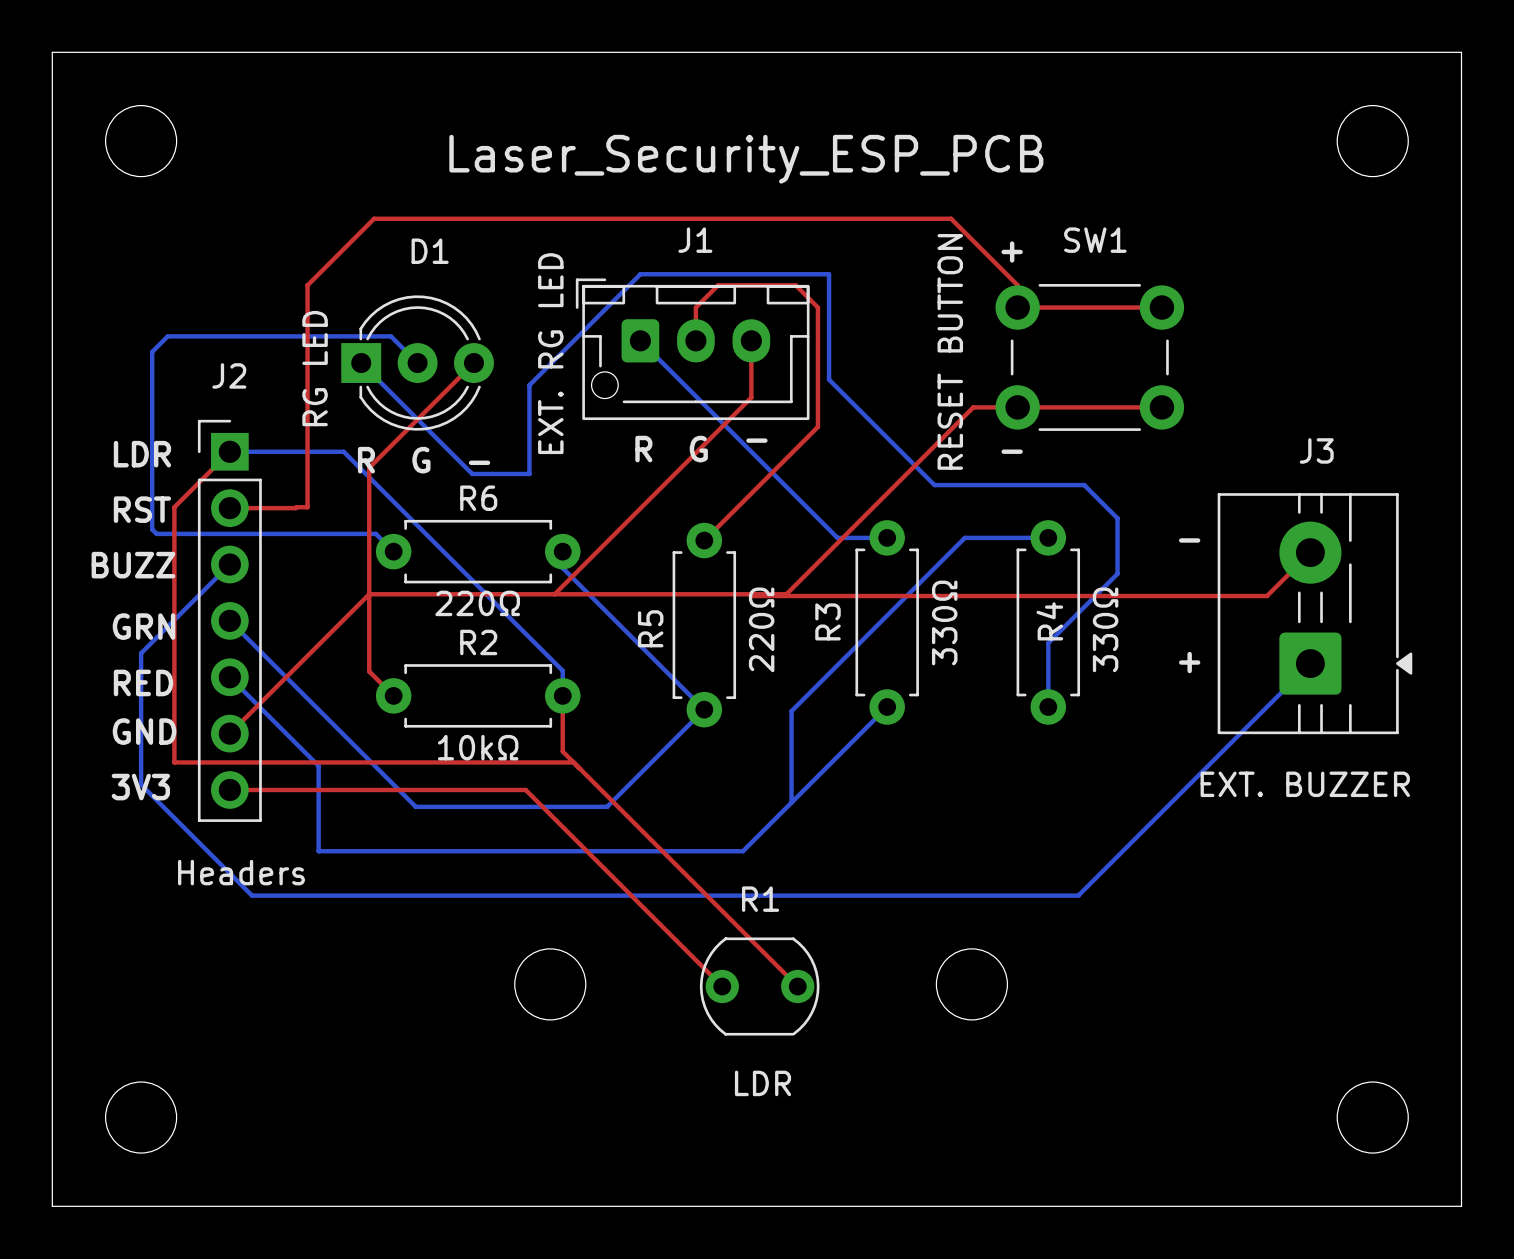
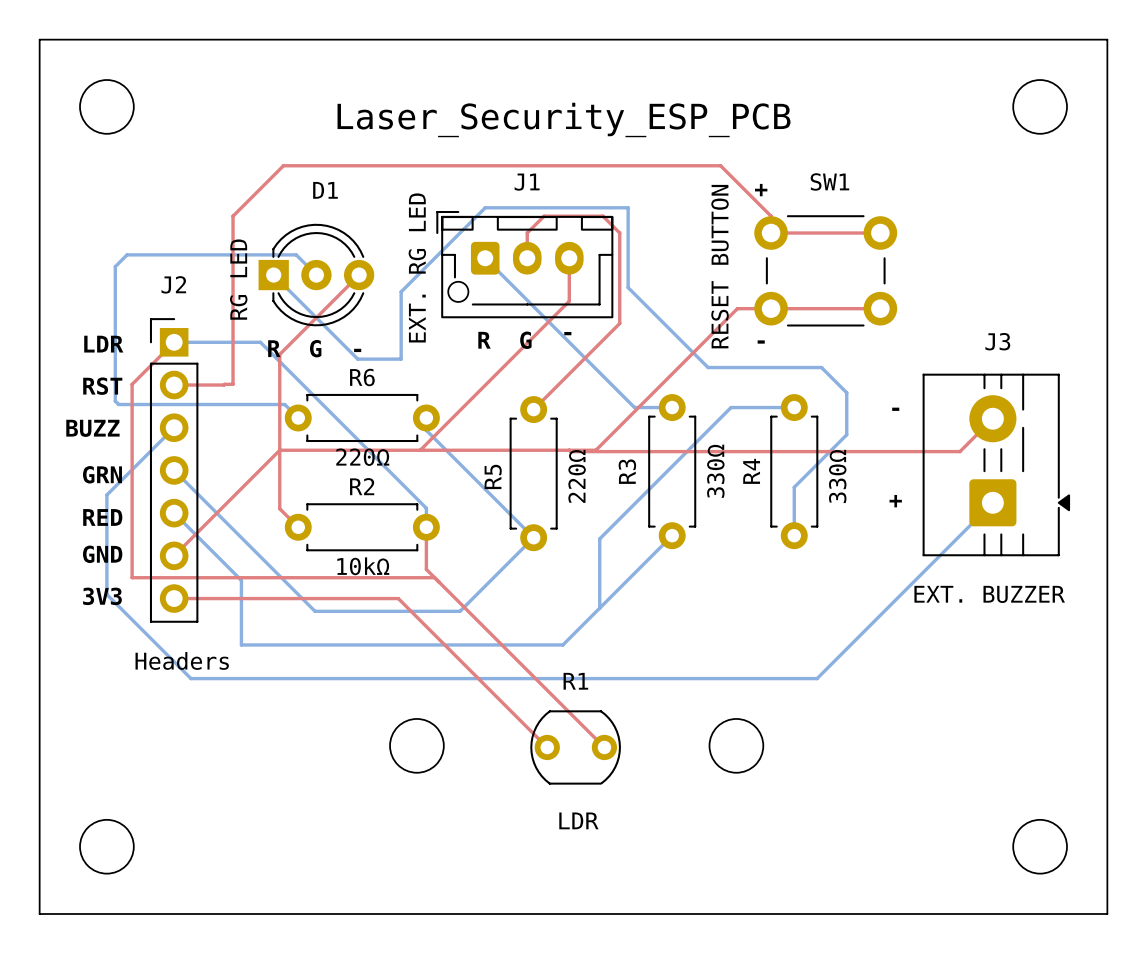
R4 name position: R4 (1049, 621) -> R4 (751, 471)

